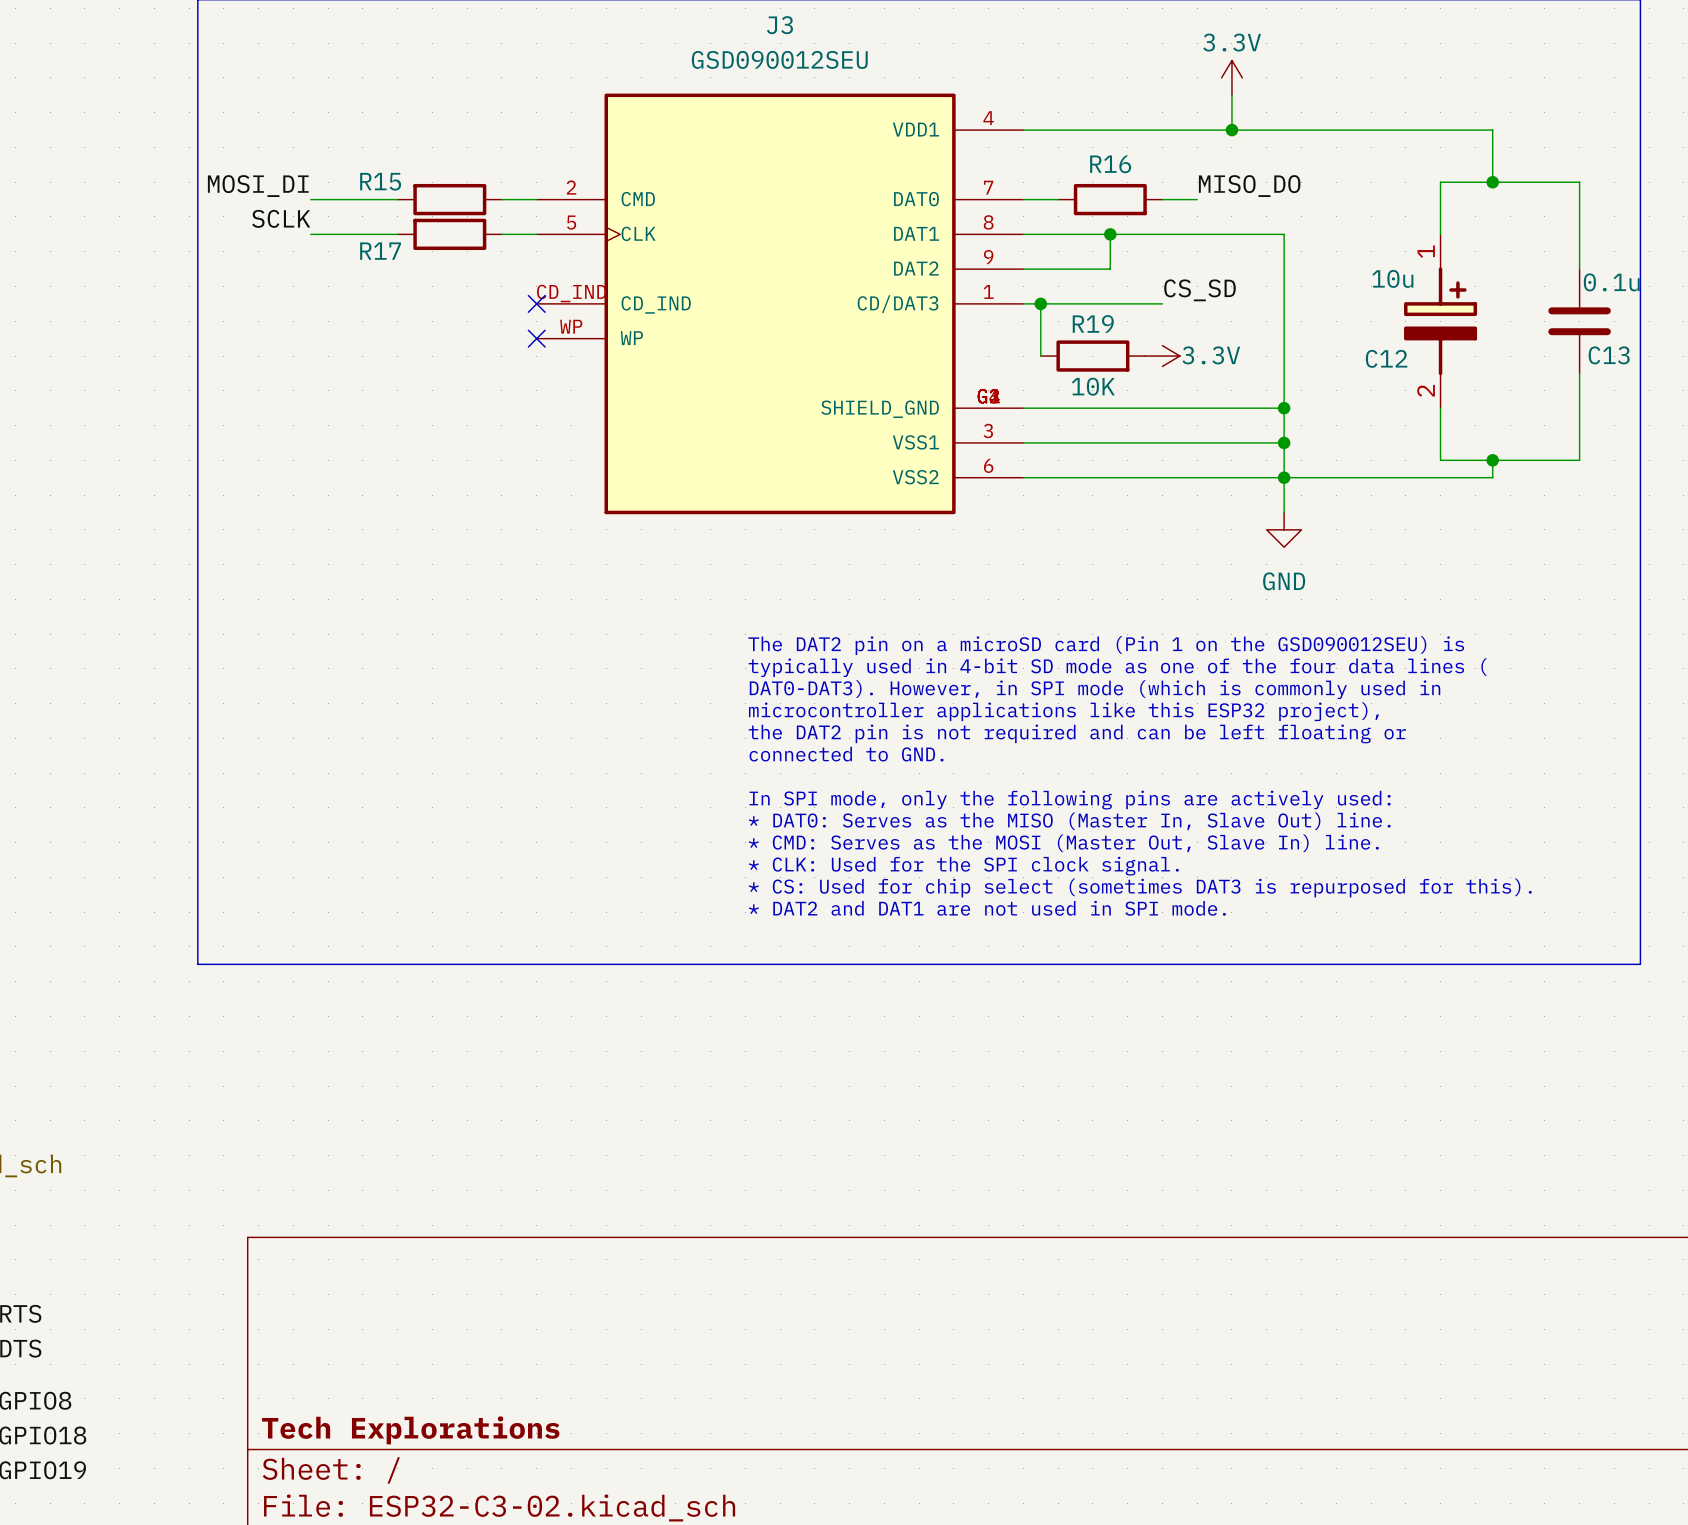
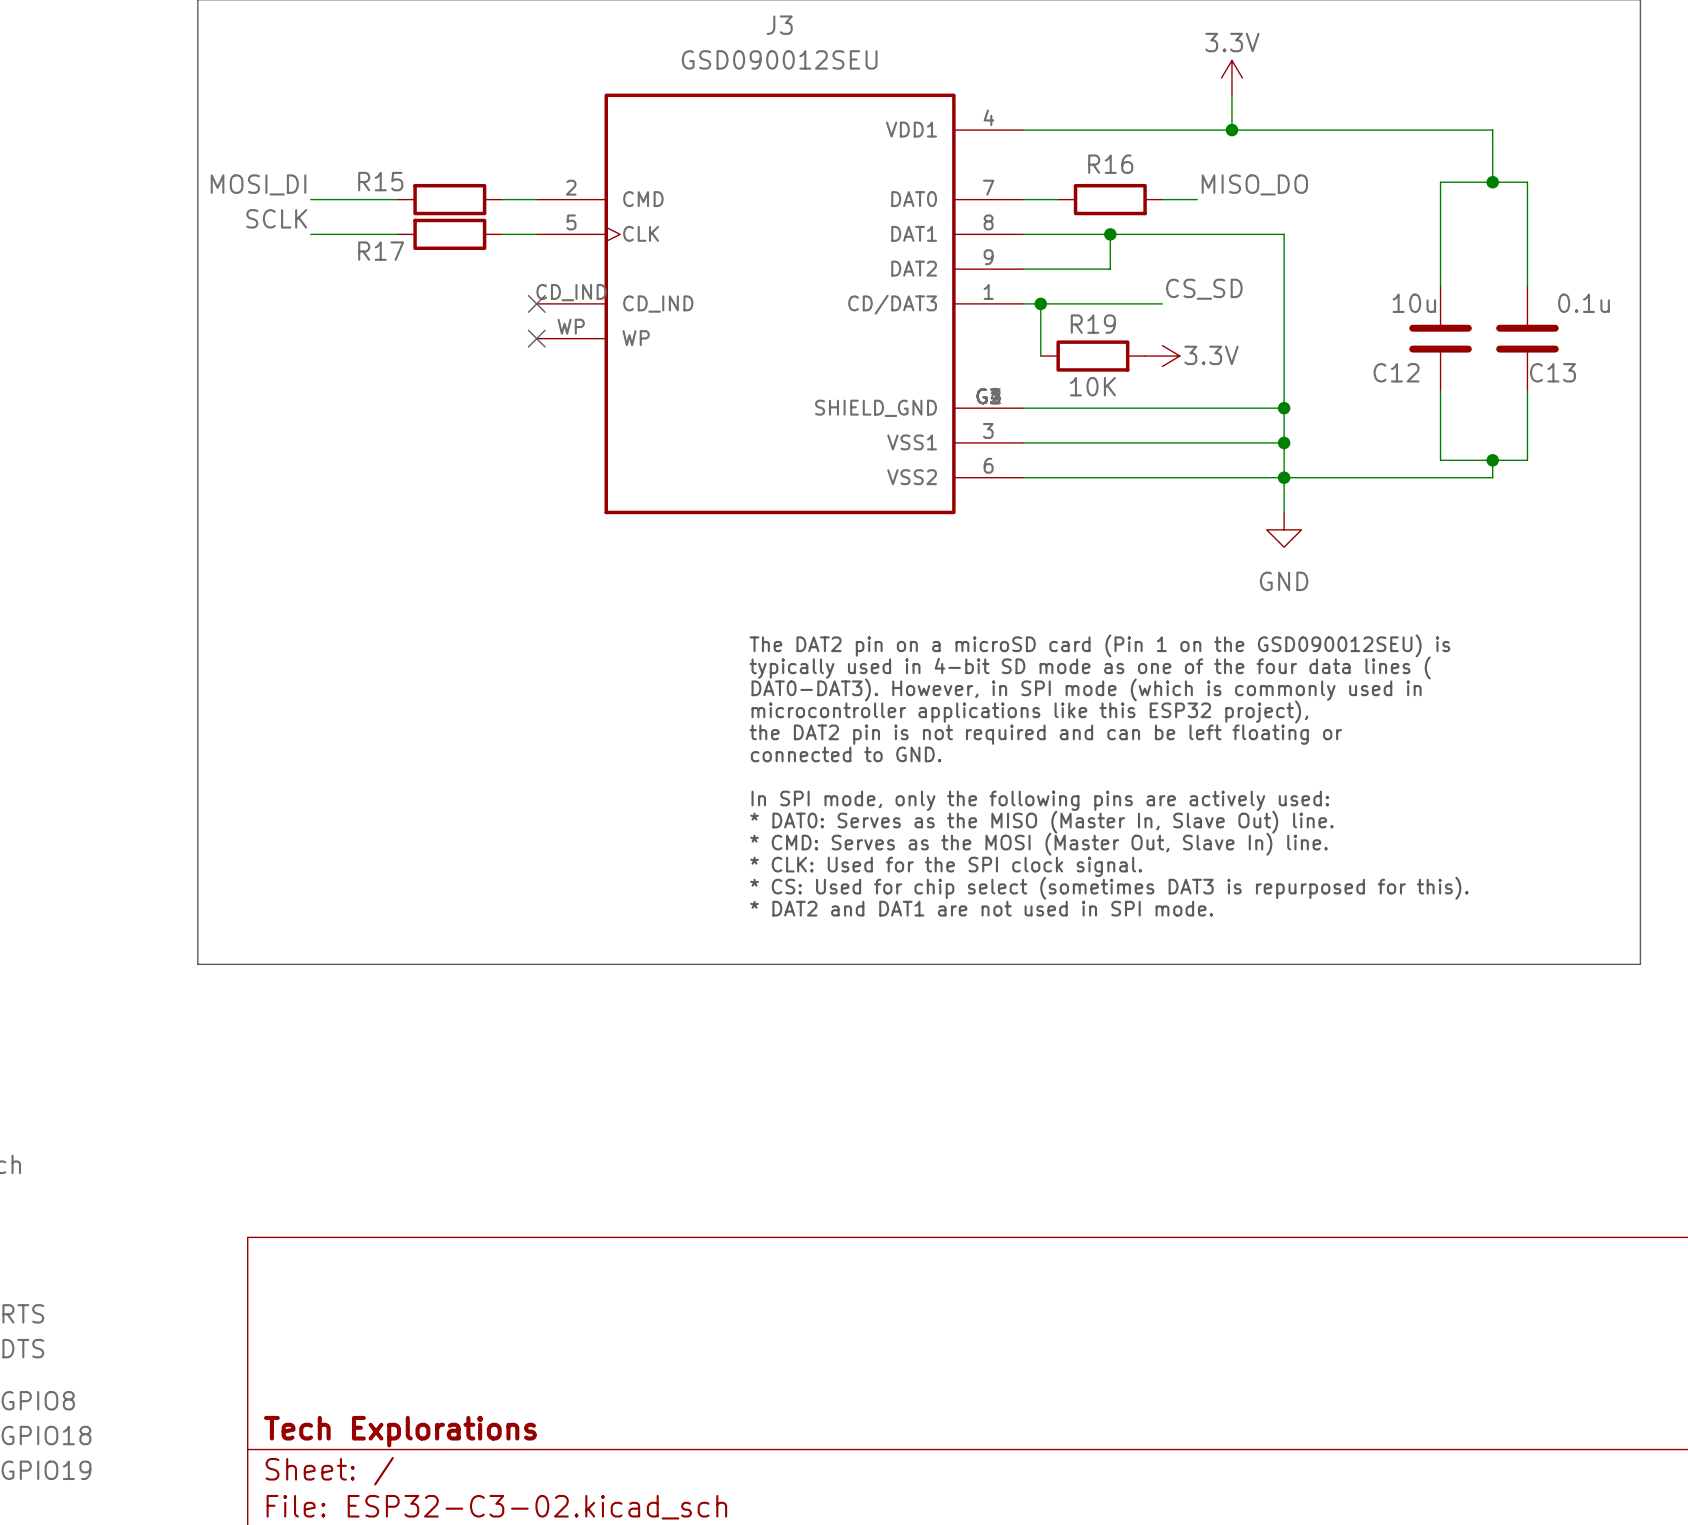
wire: (1527, 182) (1579, 182) (1579, 269) -> (1527, 182) (1527, 286)
C12 symbol: [1404, 234, 1478, 409] -> [1409, 286, 1472, 391]
C13 value position: 0.1u (1611, 282) -> 0.1u (1584, 303)
C13 position: (1579, 321) -> (1527, 338)
wire: (1579, 373) (1579, 460) (1527, 460) -> (1527, 390) (1527, 460)

